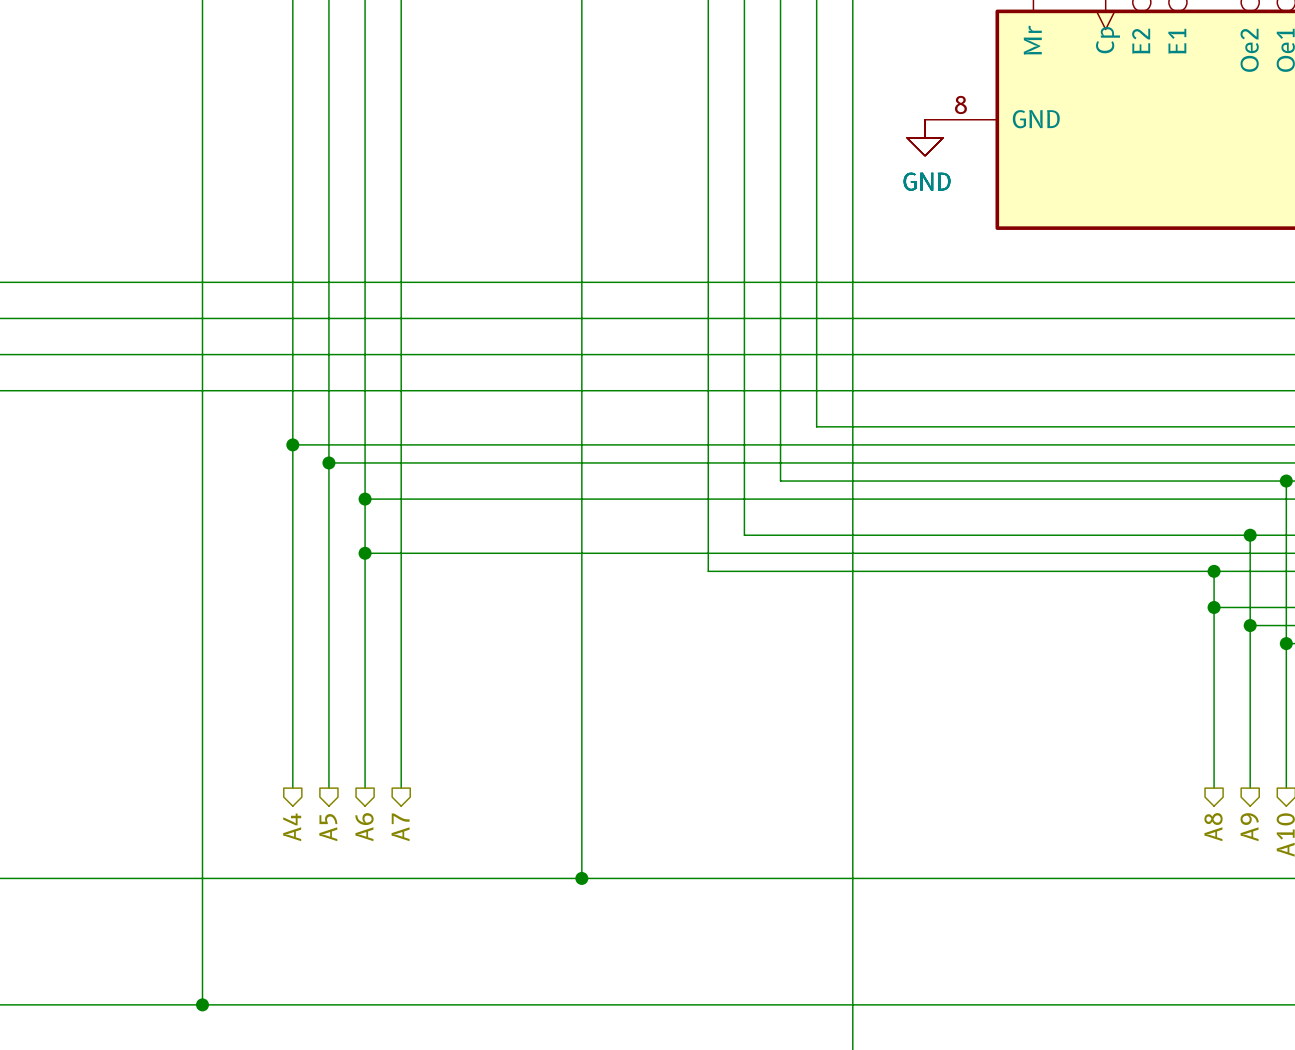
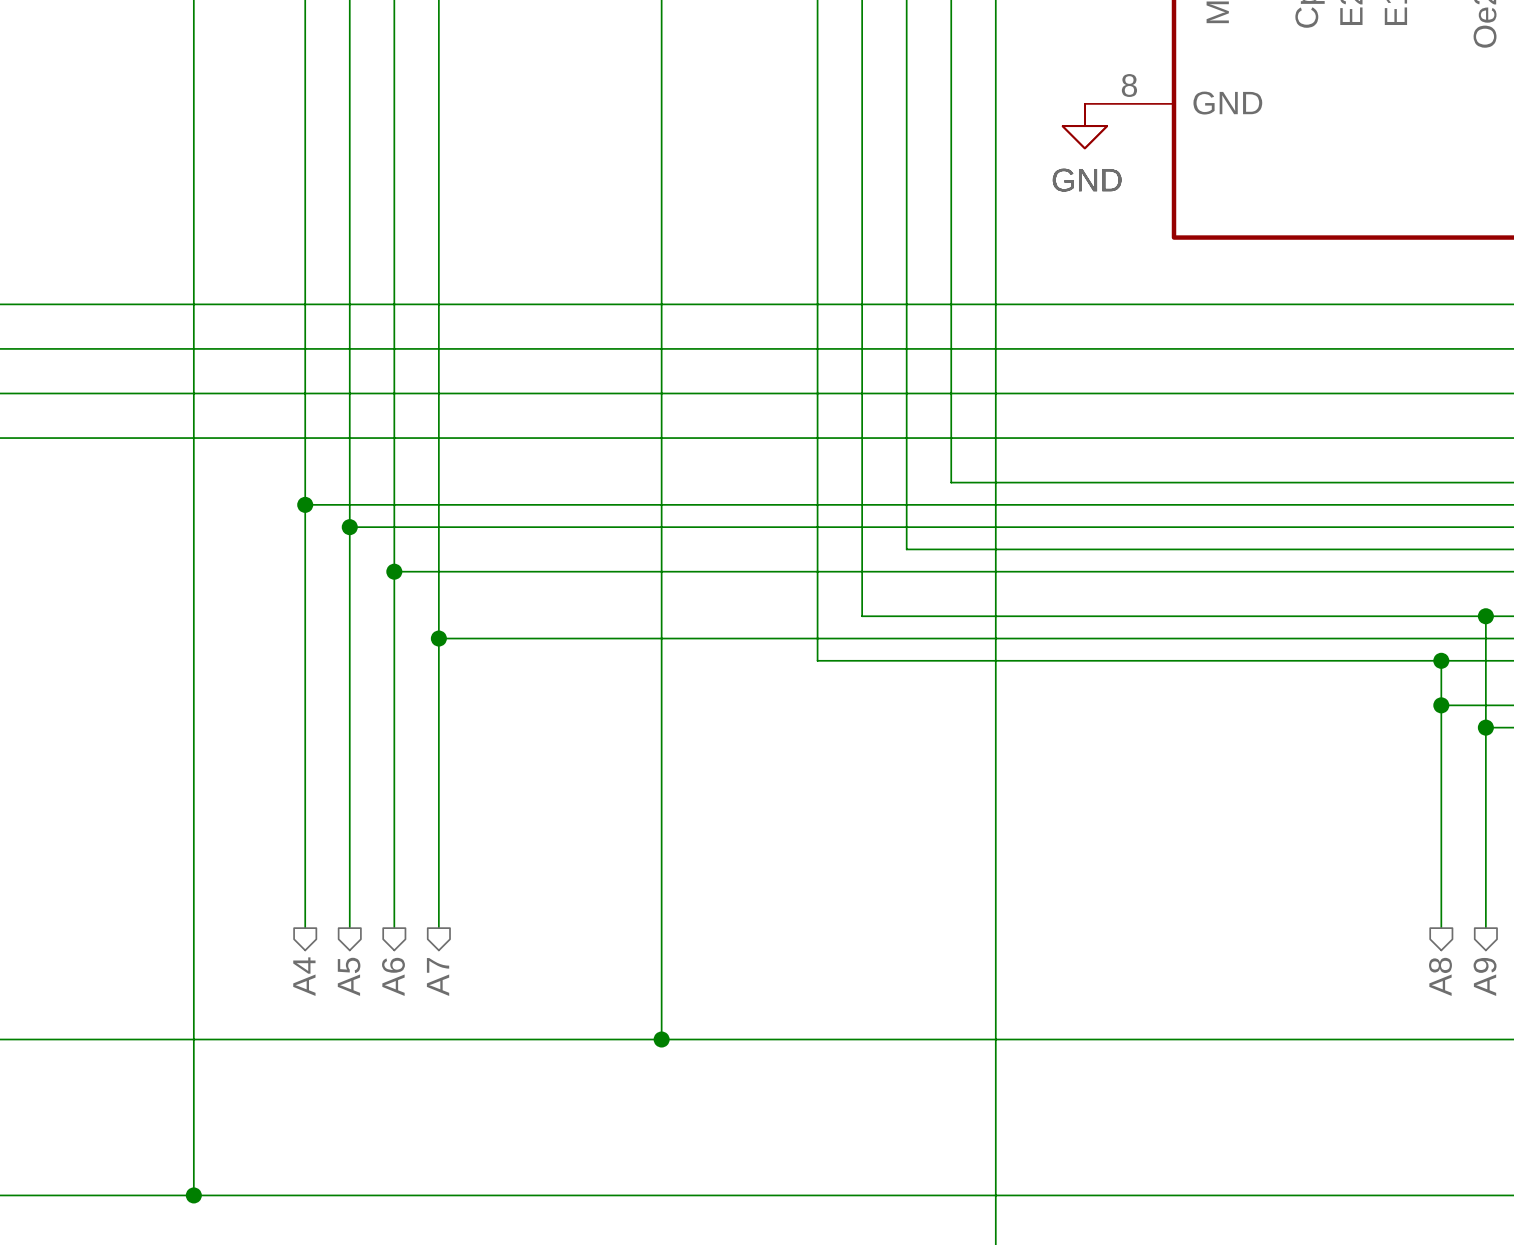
wire: (365, 553) (401, 553) -> none
junction position: (365, 553) -> (438, 638)

